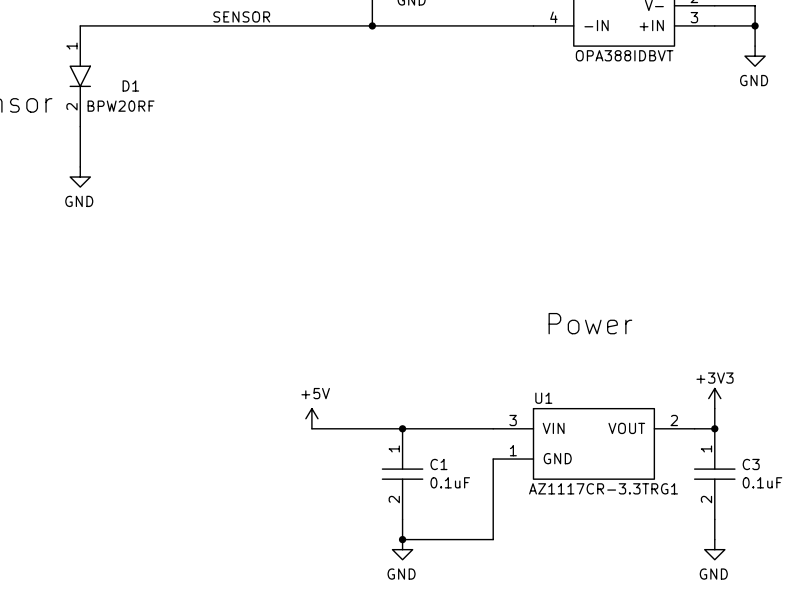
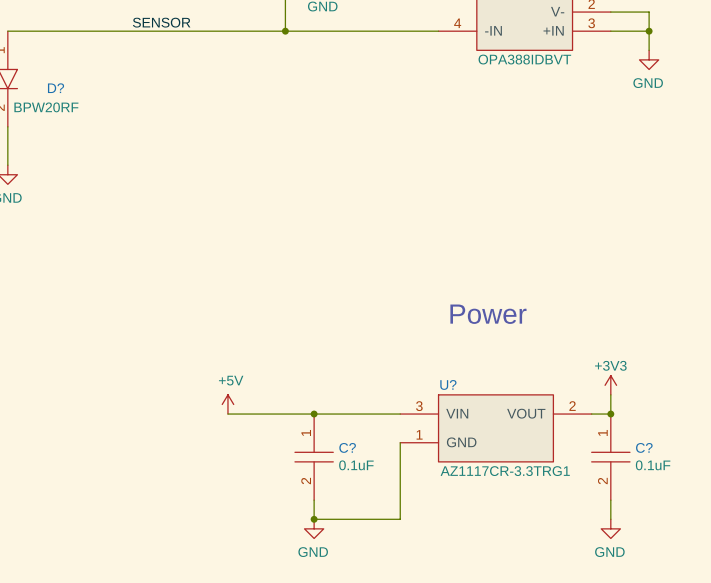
D1 name: D1 (130, 85) -> D? (56, 88)
U1 name: U1 (543, 398) -> U? (448, 384)
C1 name: C1 (438, 464) -> C? (347, 447)
C3 name: C3 (751, 464) -> C? (644, 447)

